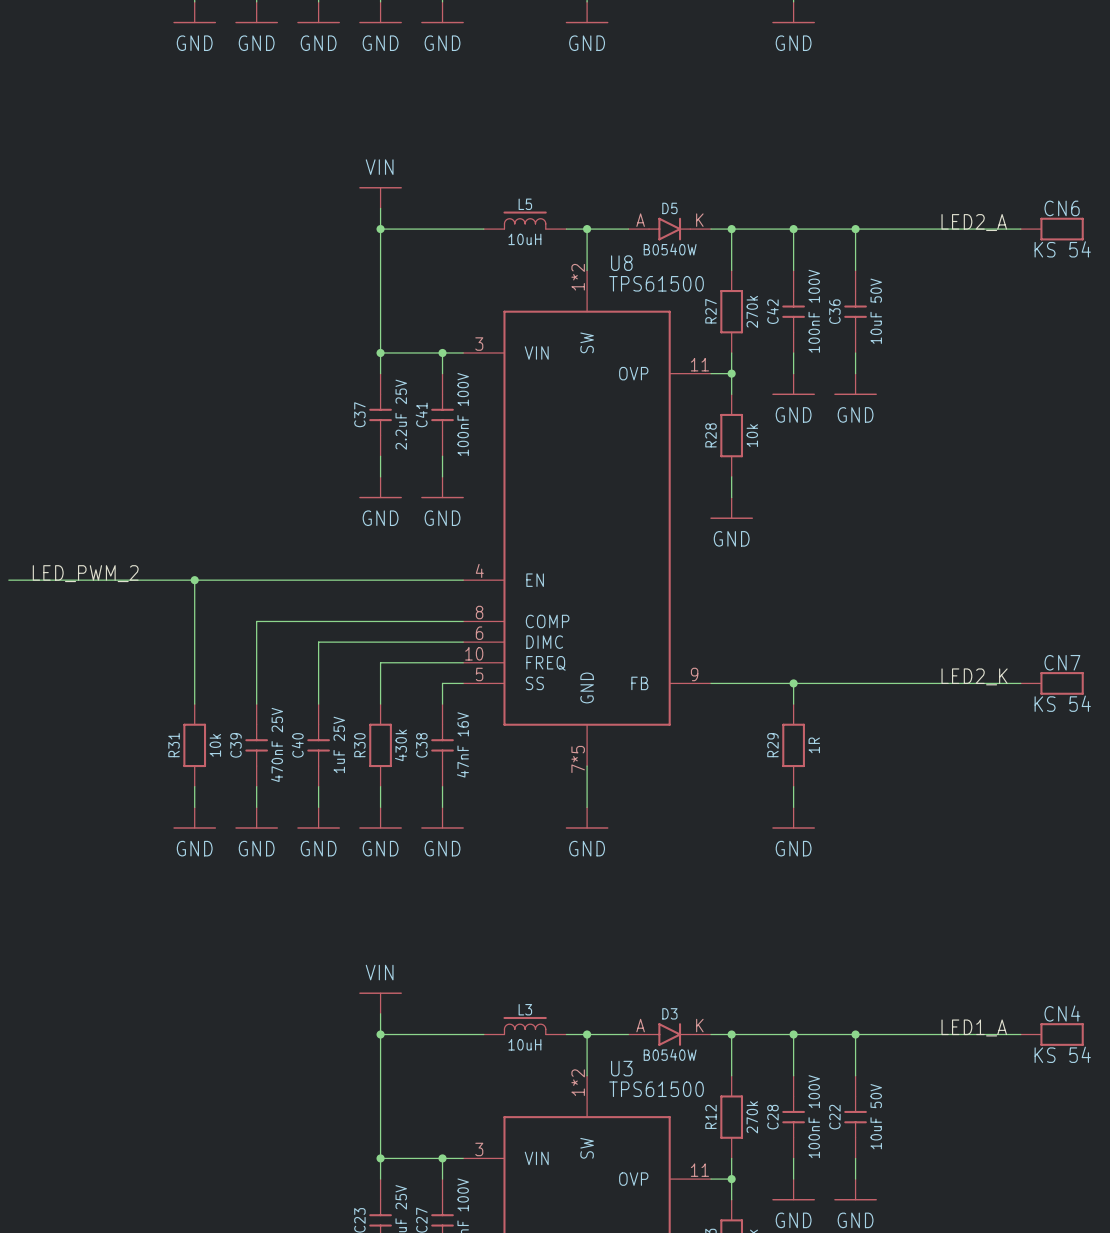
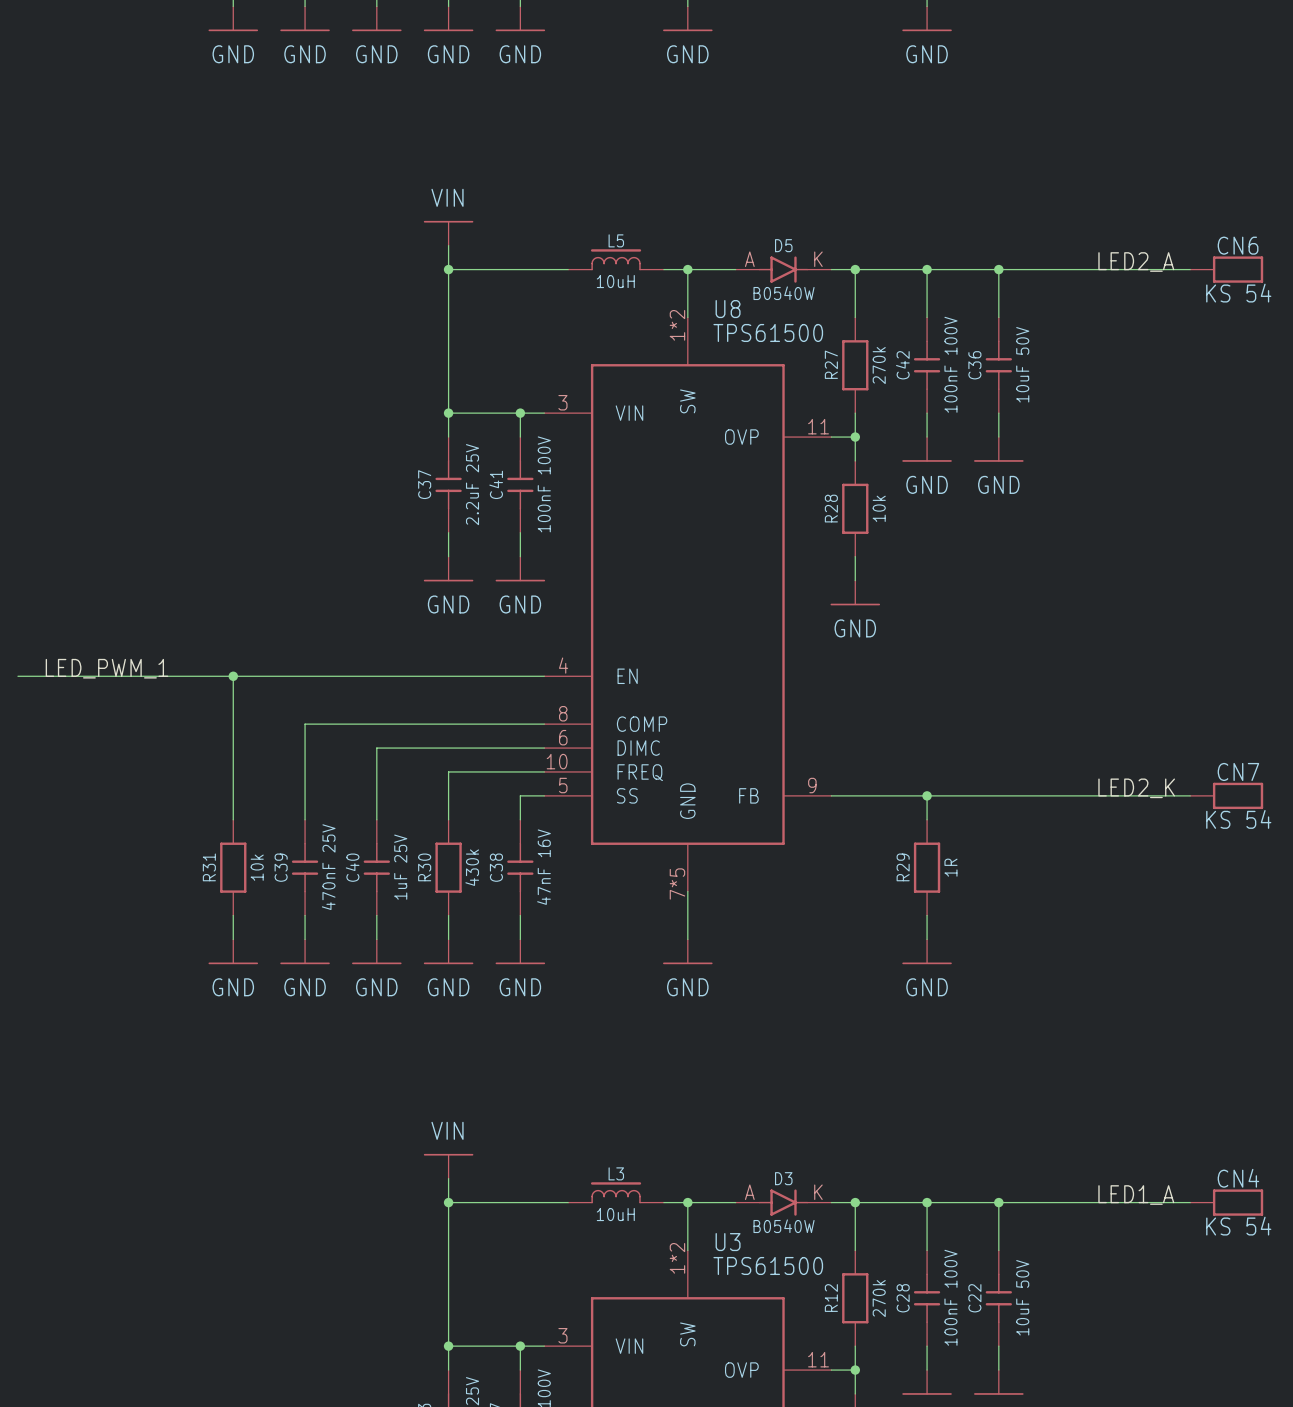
label: LED_PWM_2 (85, 573) -> LED_PWM_1 (107, 668)

